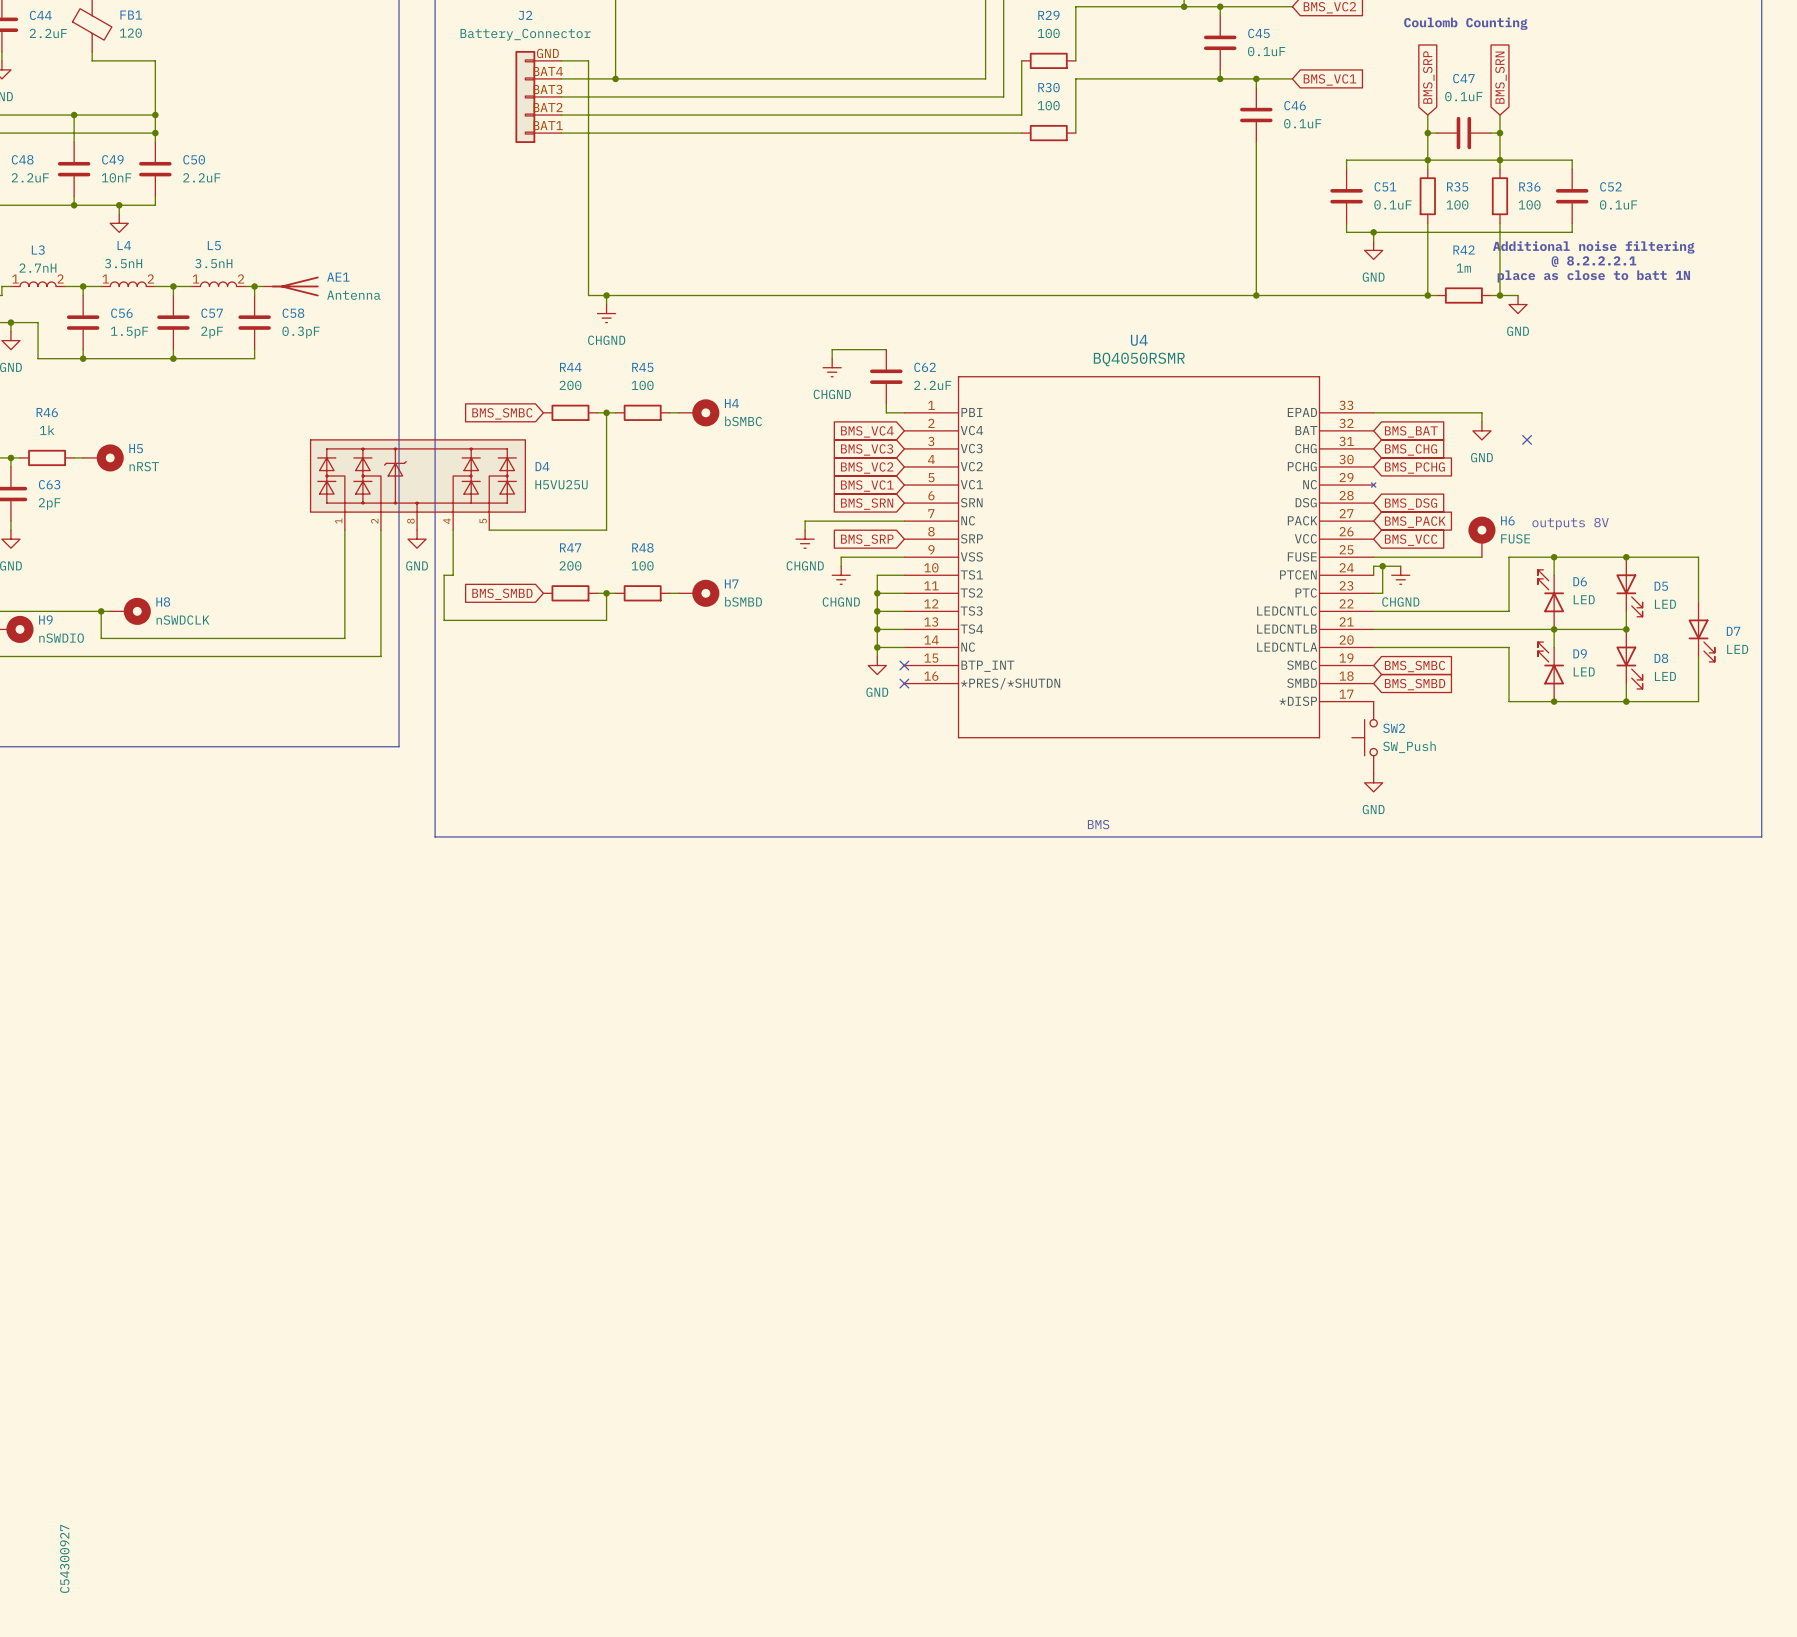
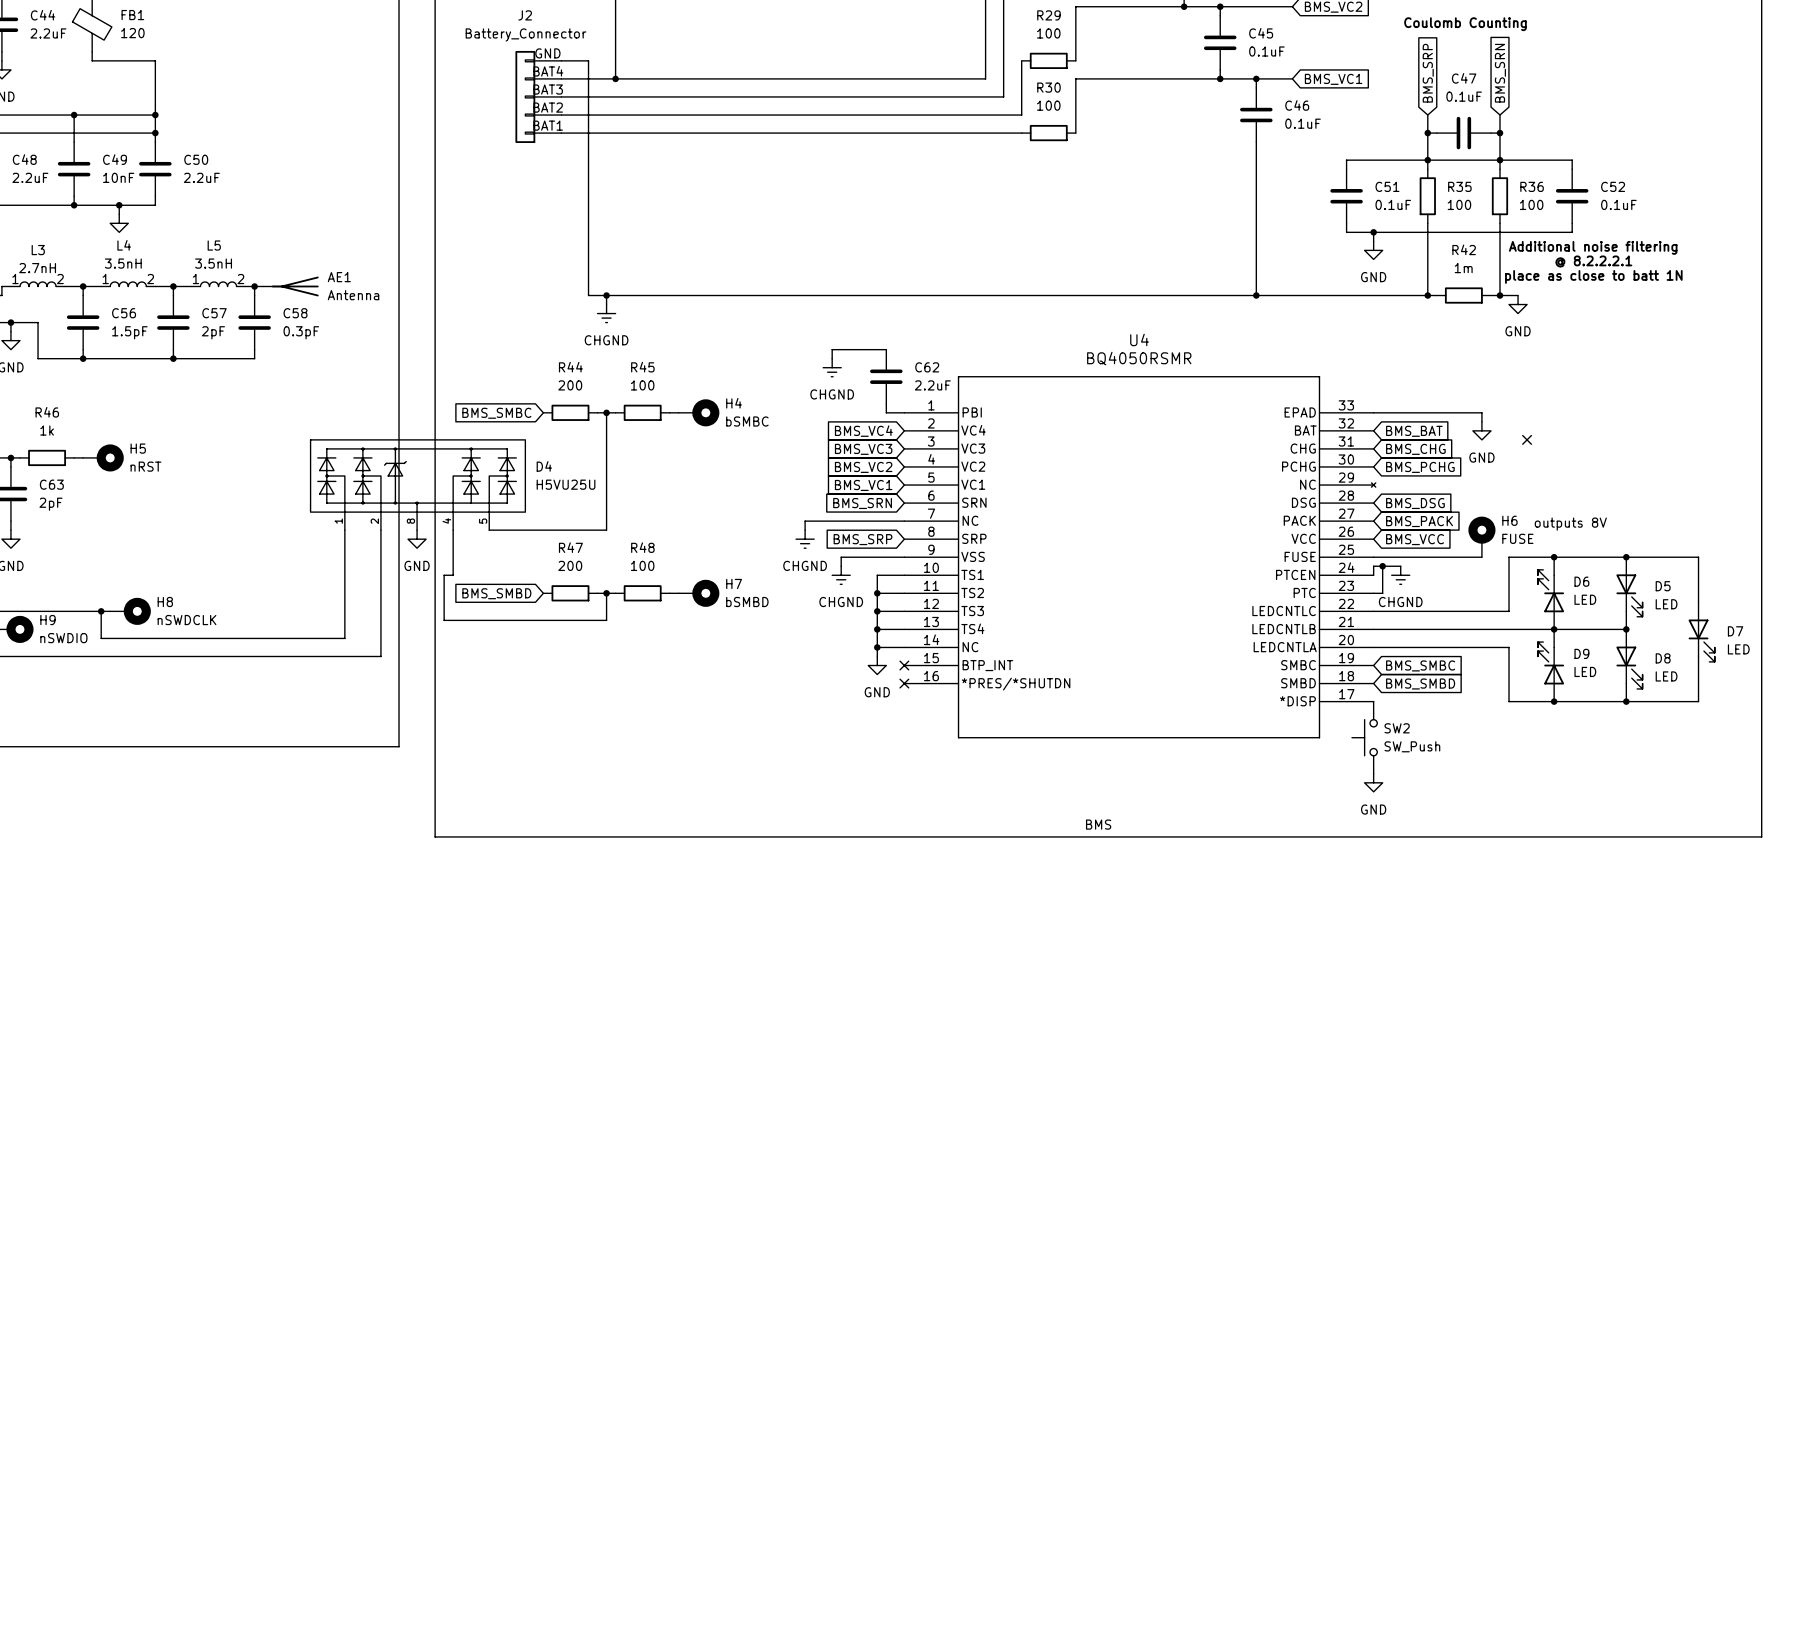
part text: C54300927 (64, 1558) -> none

